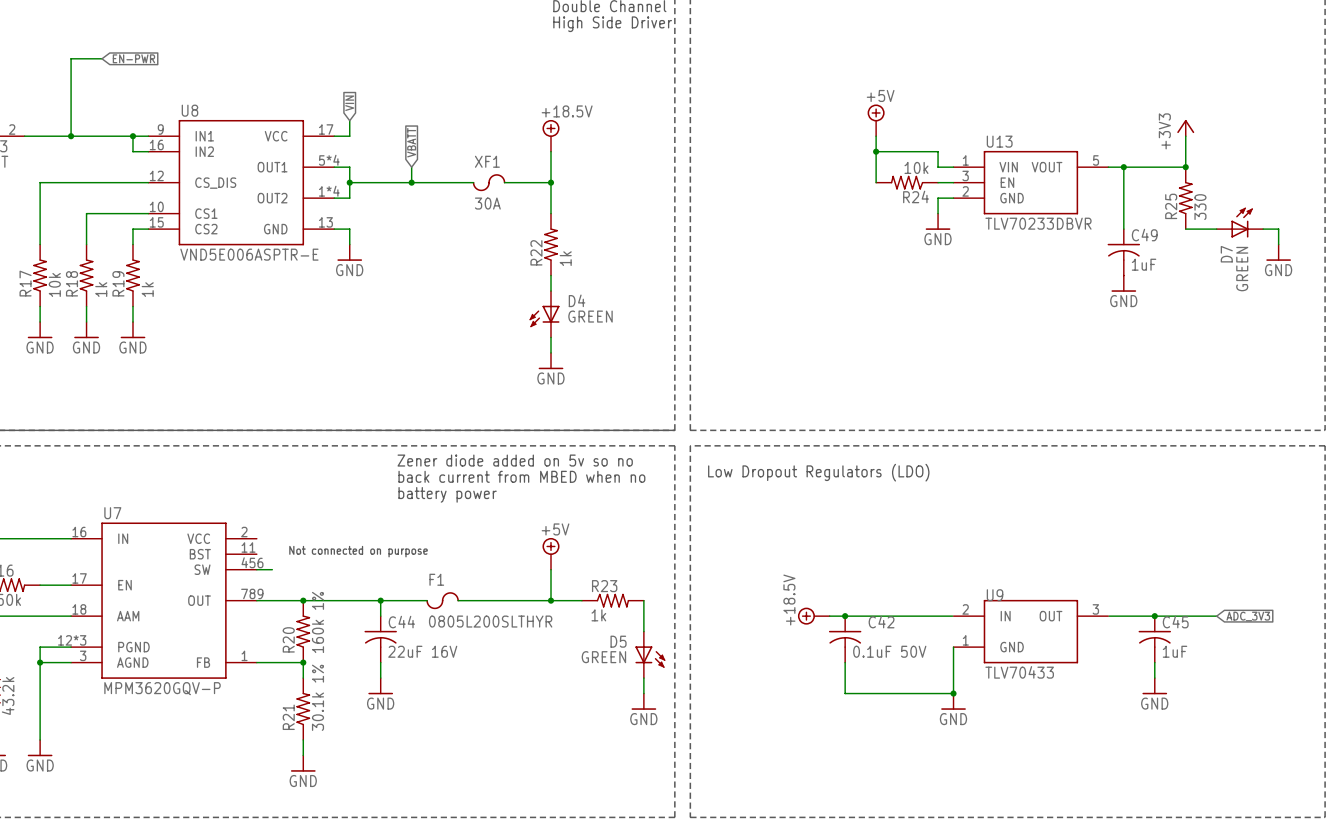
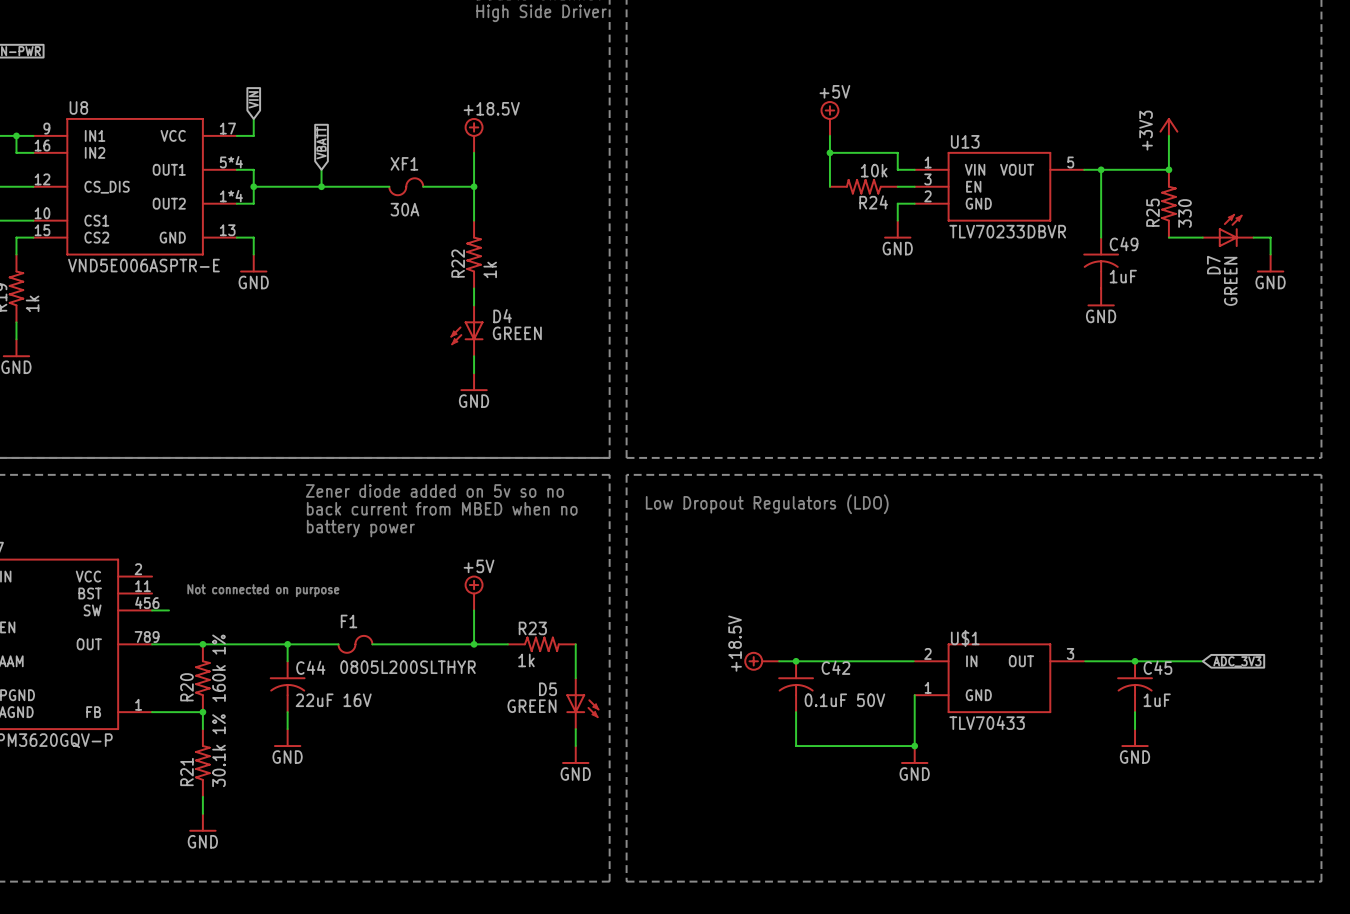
U9 name: U9 (995, 595) -> U$1 (965, 638)

